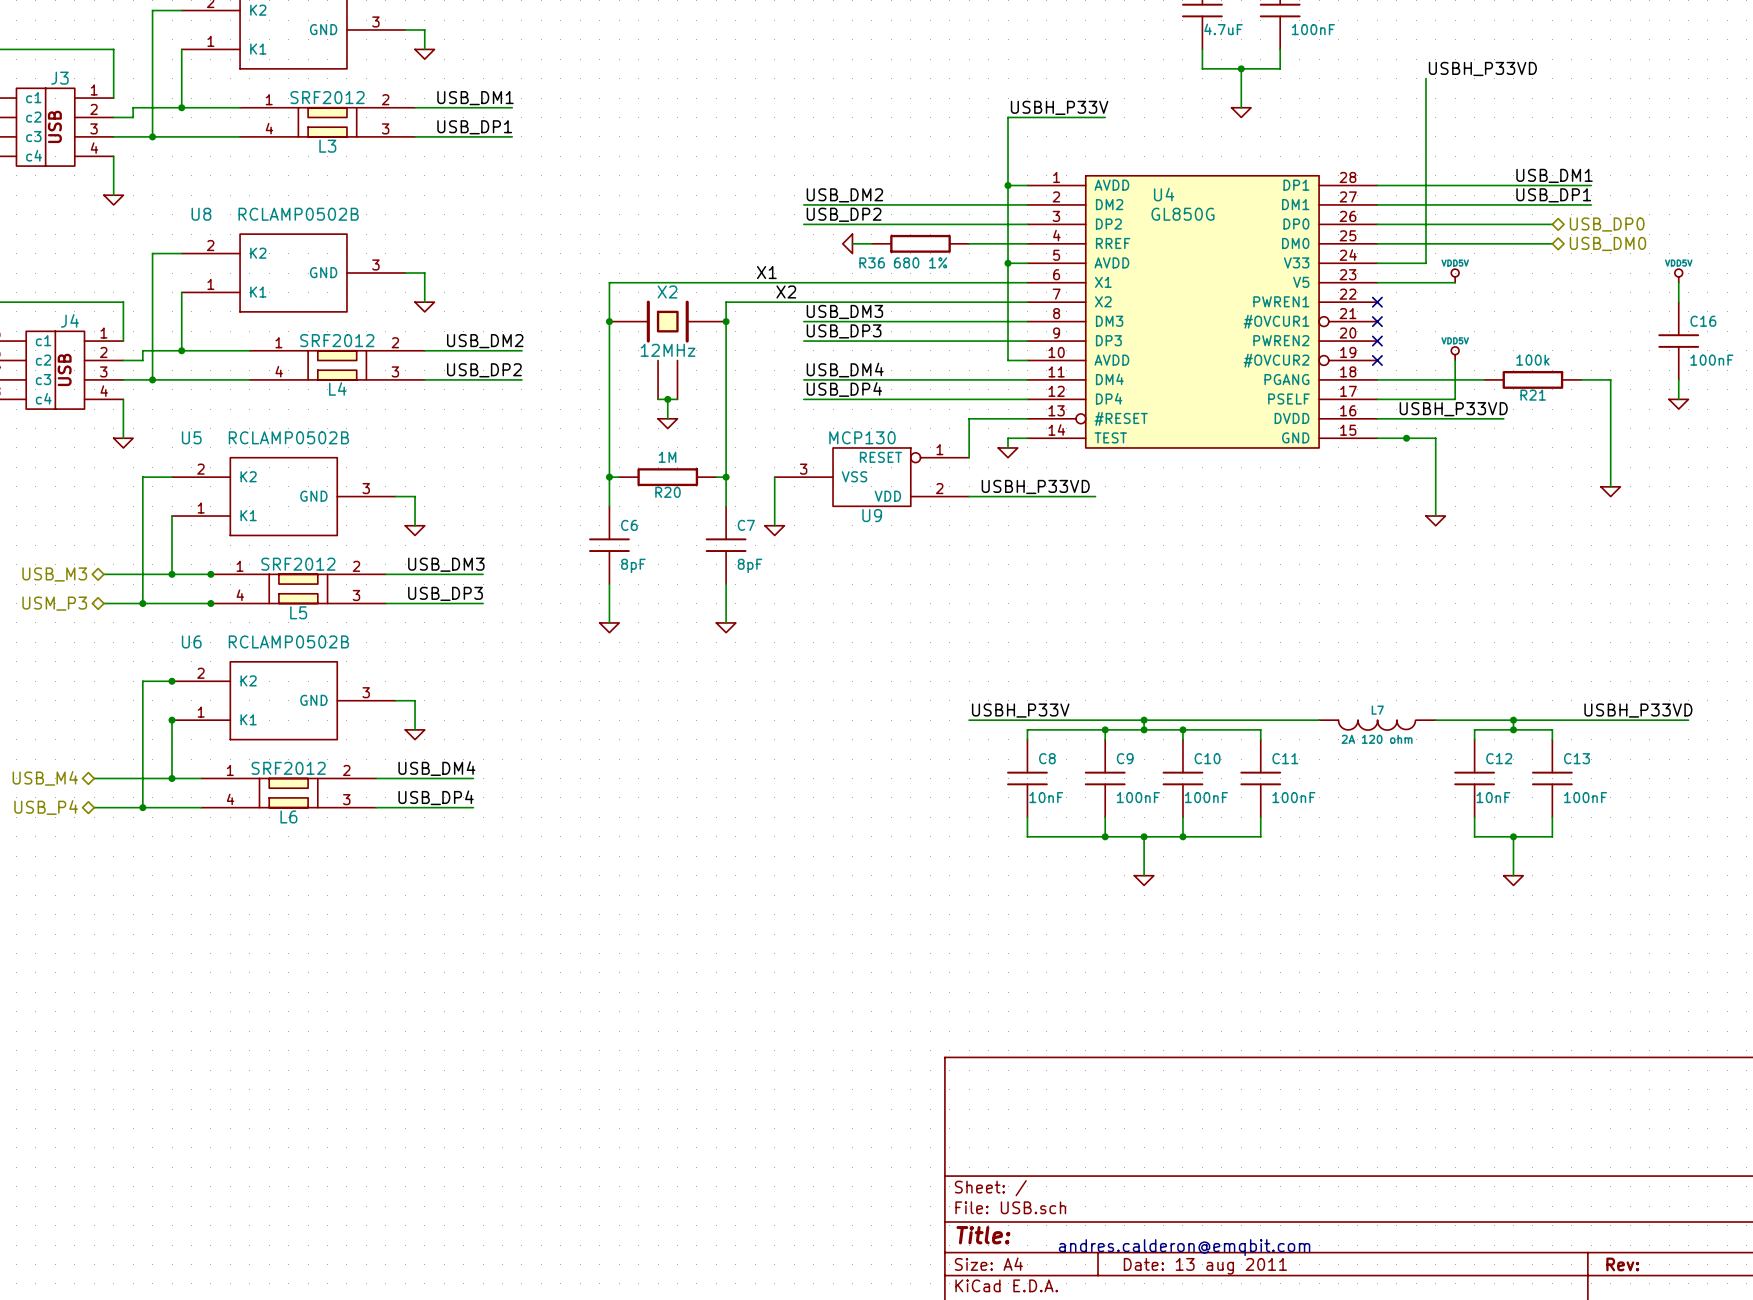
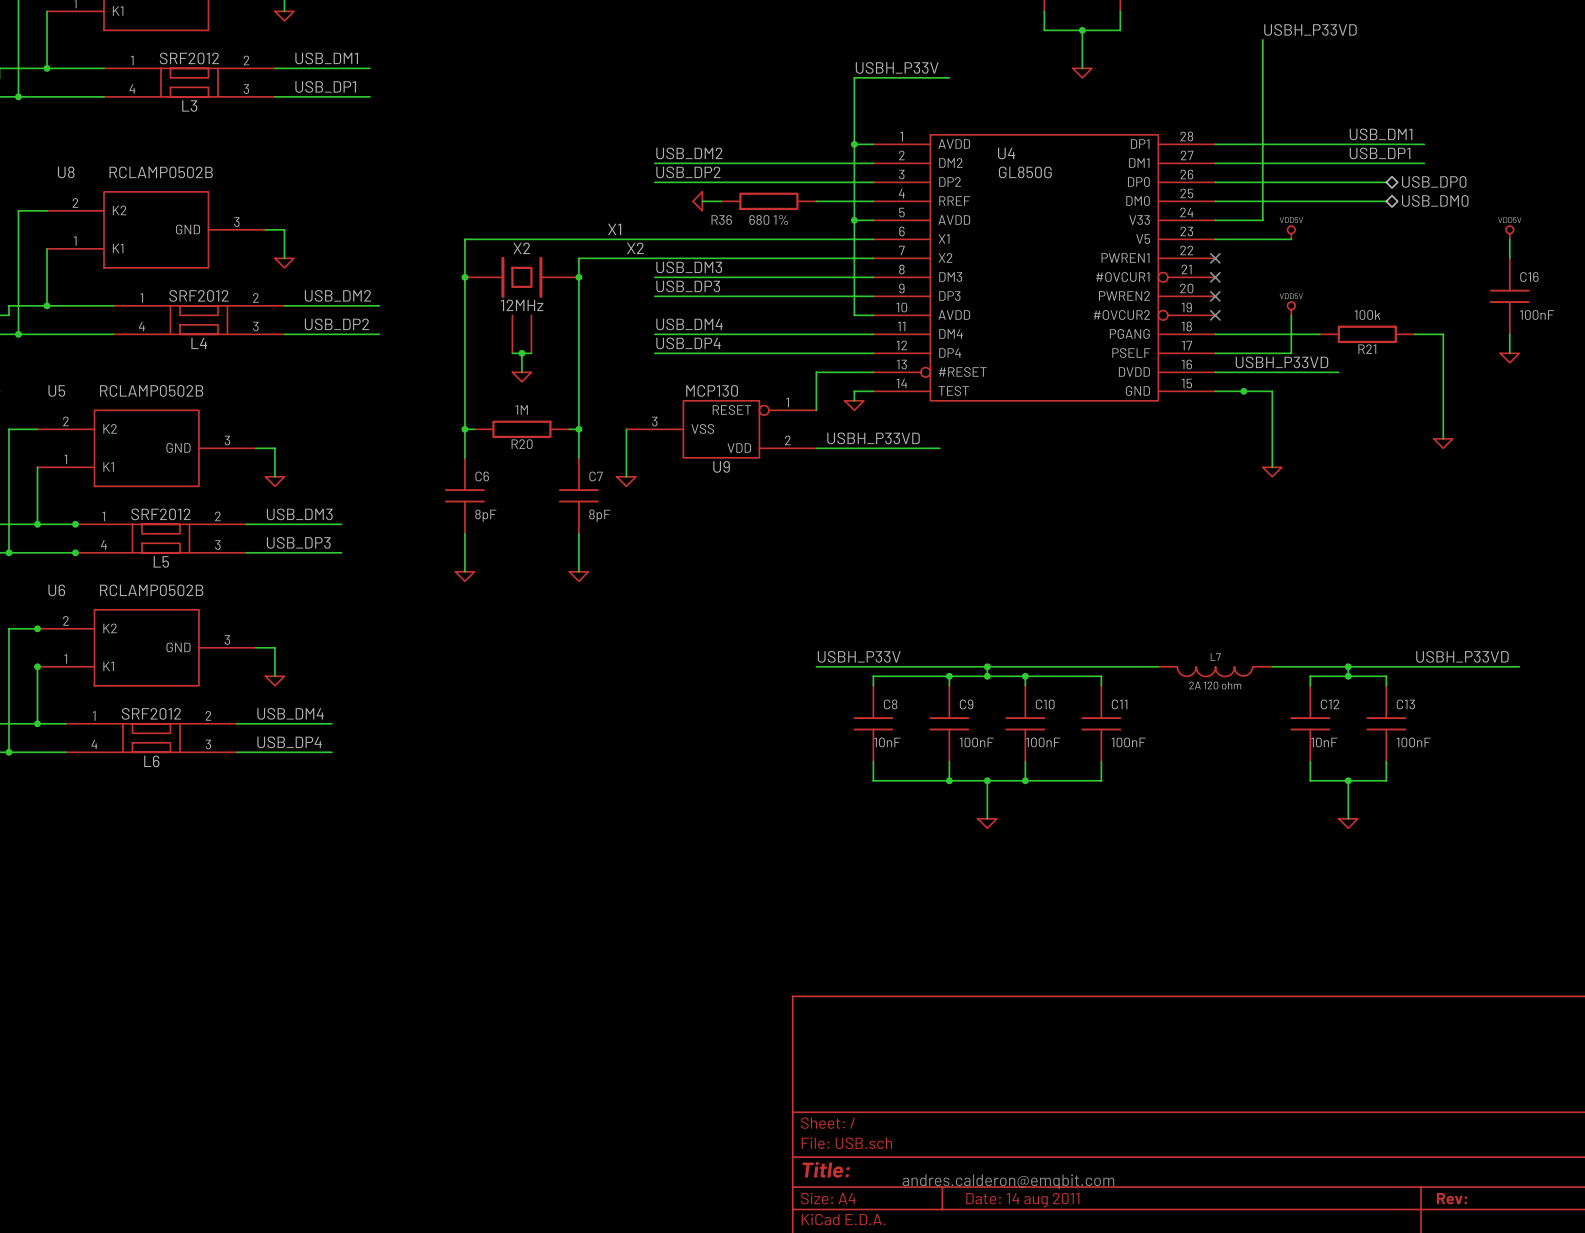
title block: Date: 13 aug 2011 (1205, 1266) -> Date: 14 aug 2011 (1022, 1200)

